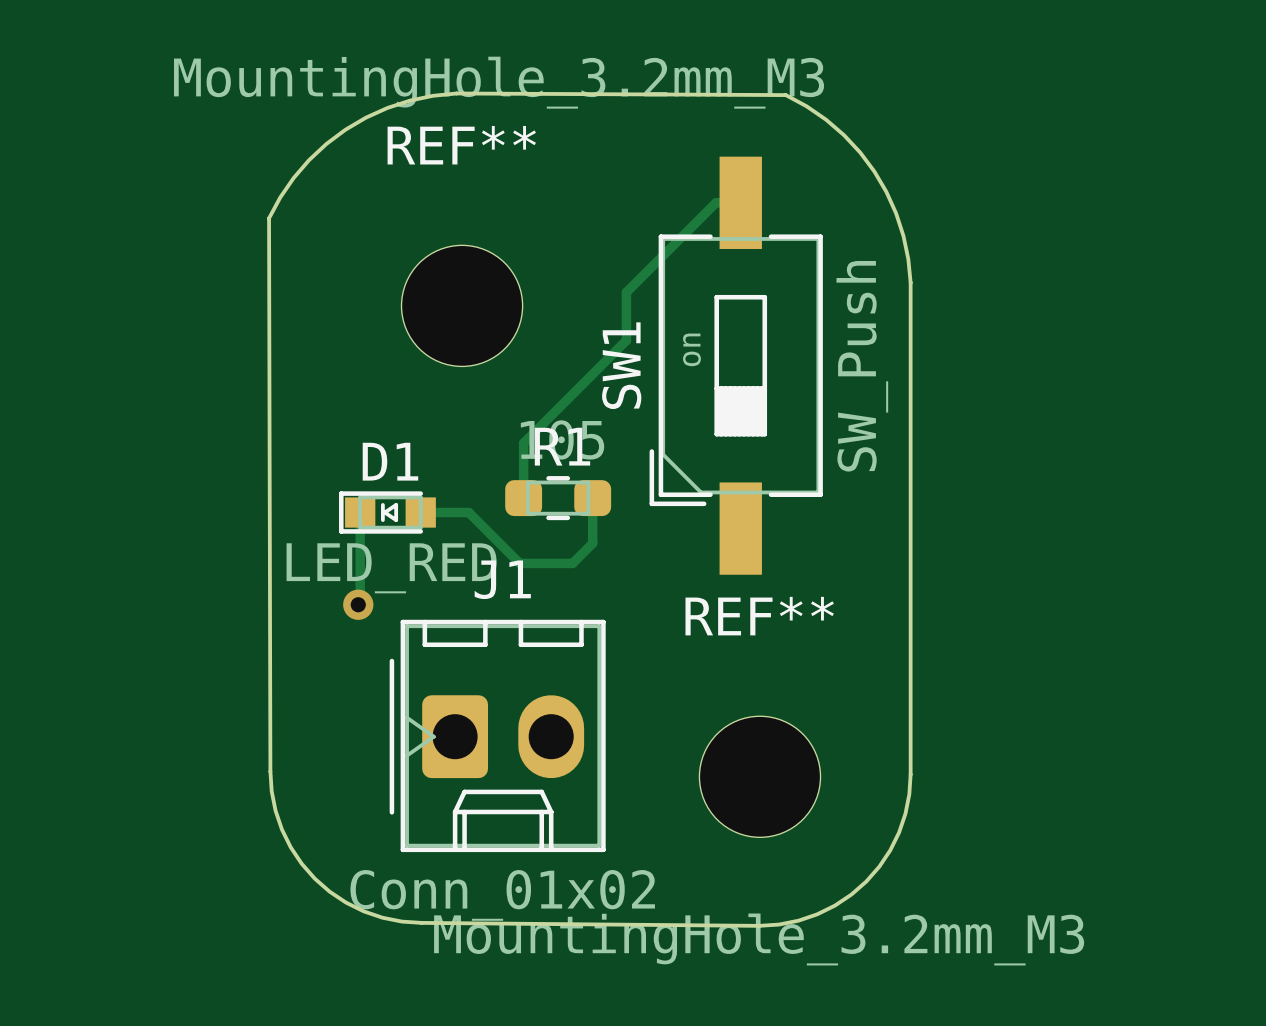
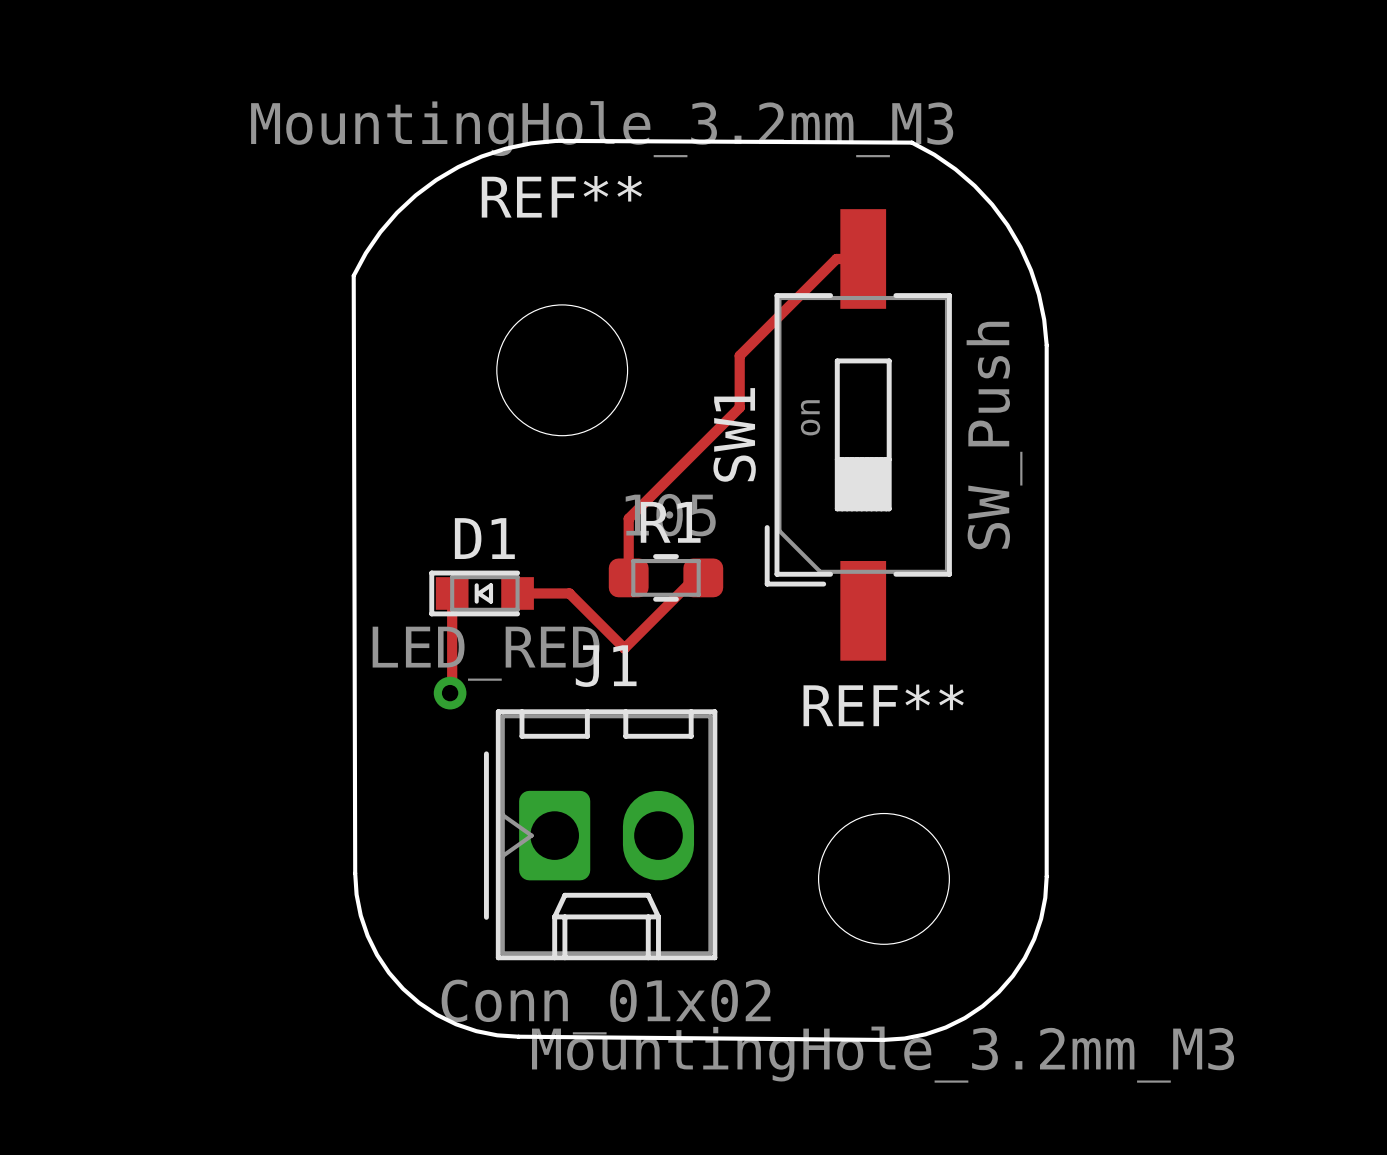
track: (592, 498) (592, 543) (572, 563) (519, 563) -> (695, 577) (624, 648)

